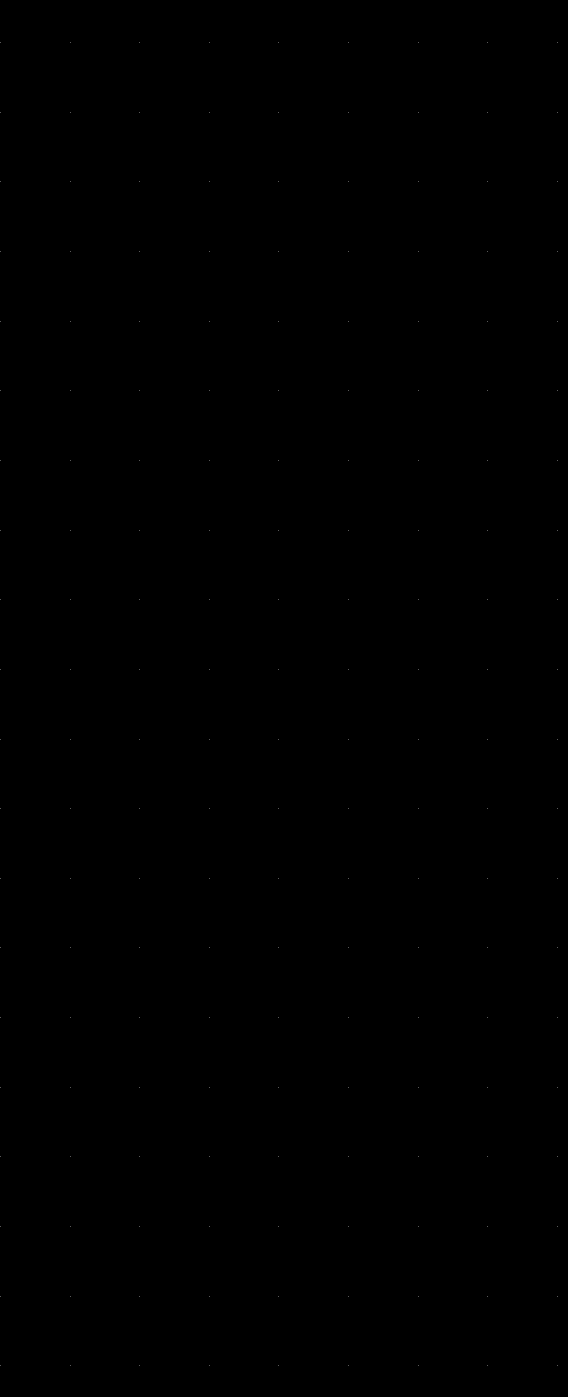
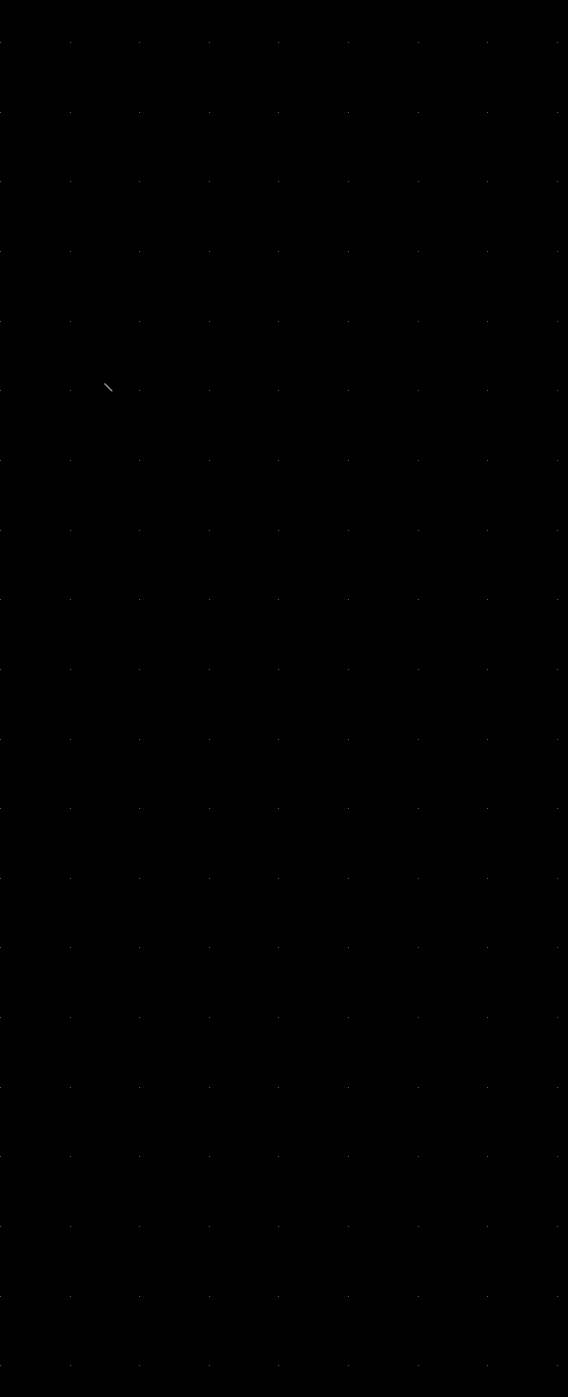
line: none -> (104, 383) (111, 390)

